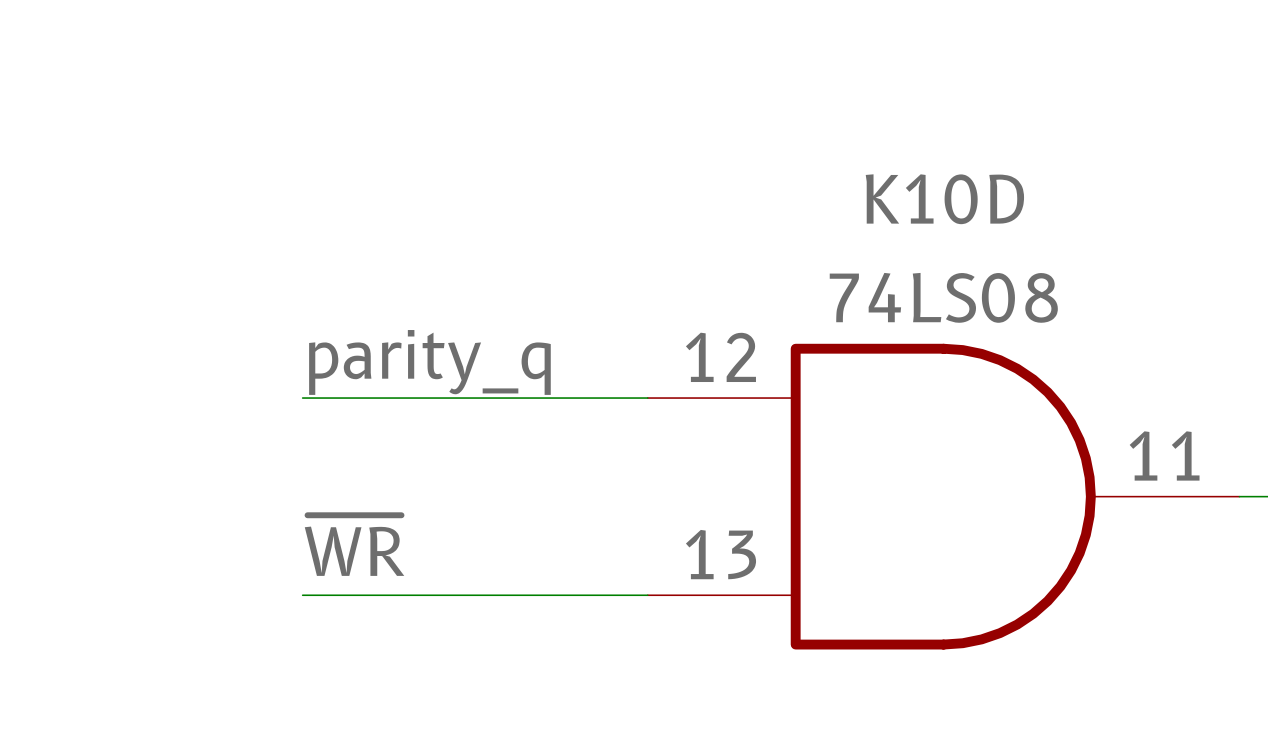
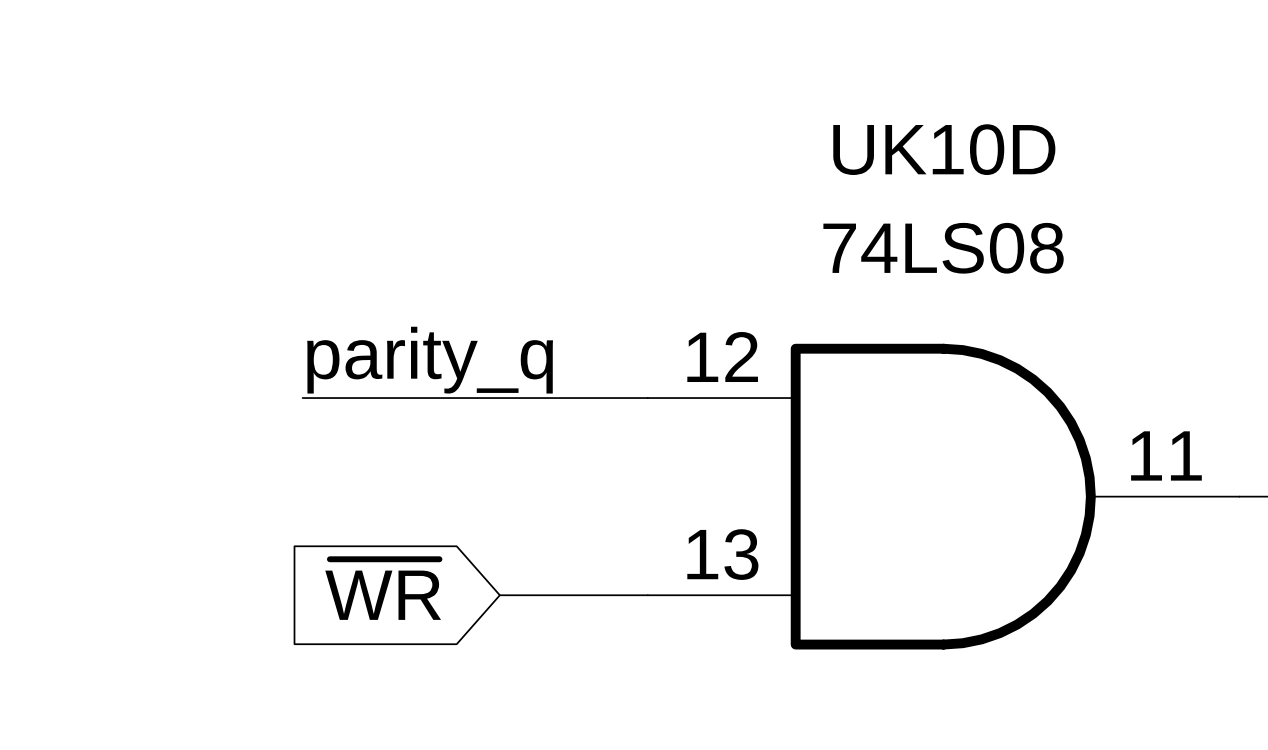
K10D name: K10D (944, 199) -> UK10D (944, 149)
K10D value position: 74LS08 (943, 297) -> 74LS08 (943, 248)
label: ~{WR} (354, 545) -> none
global label: none -> ~{WR} (383, 589)
wire: (302, 595) (499, 595) -> none

